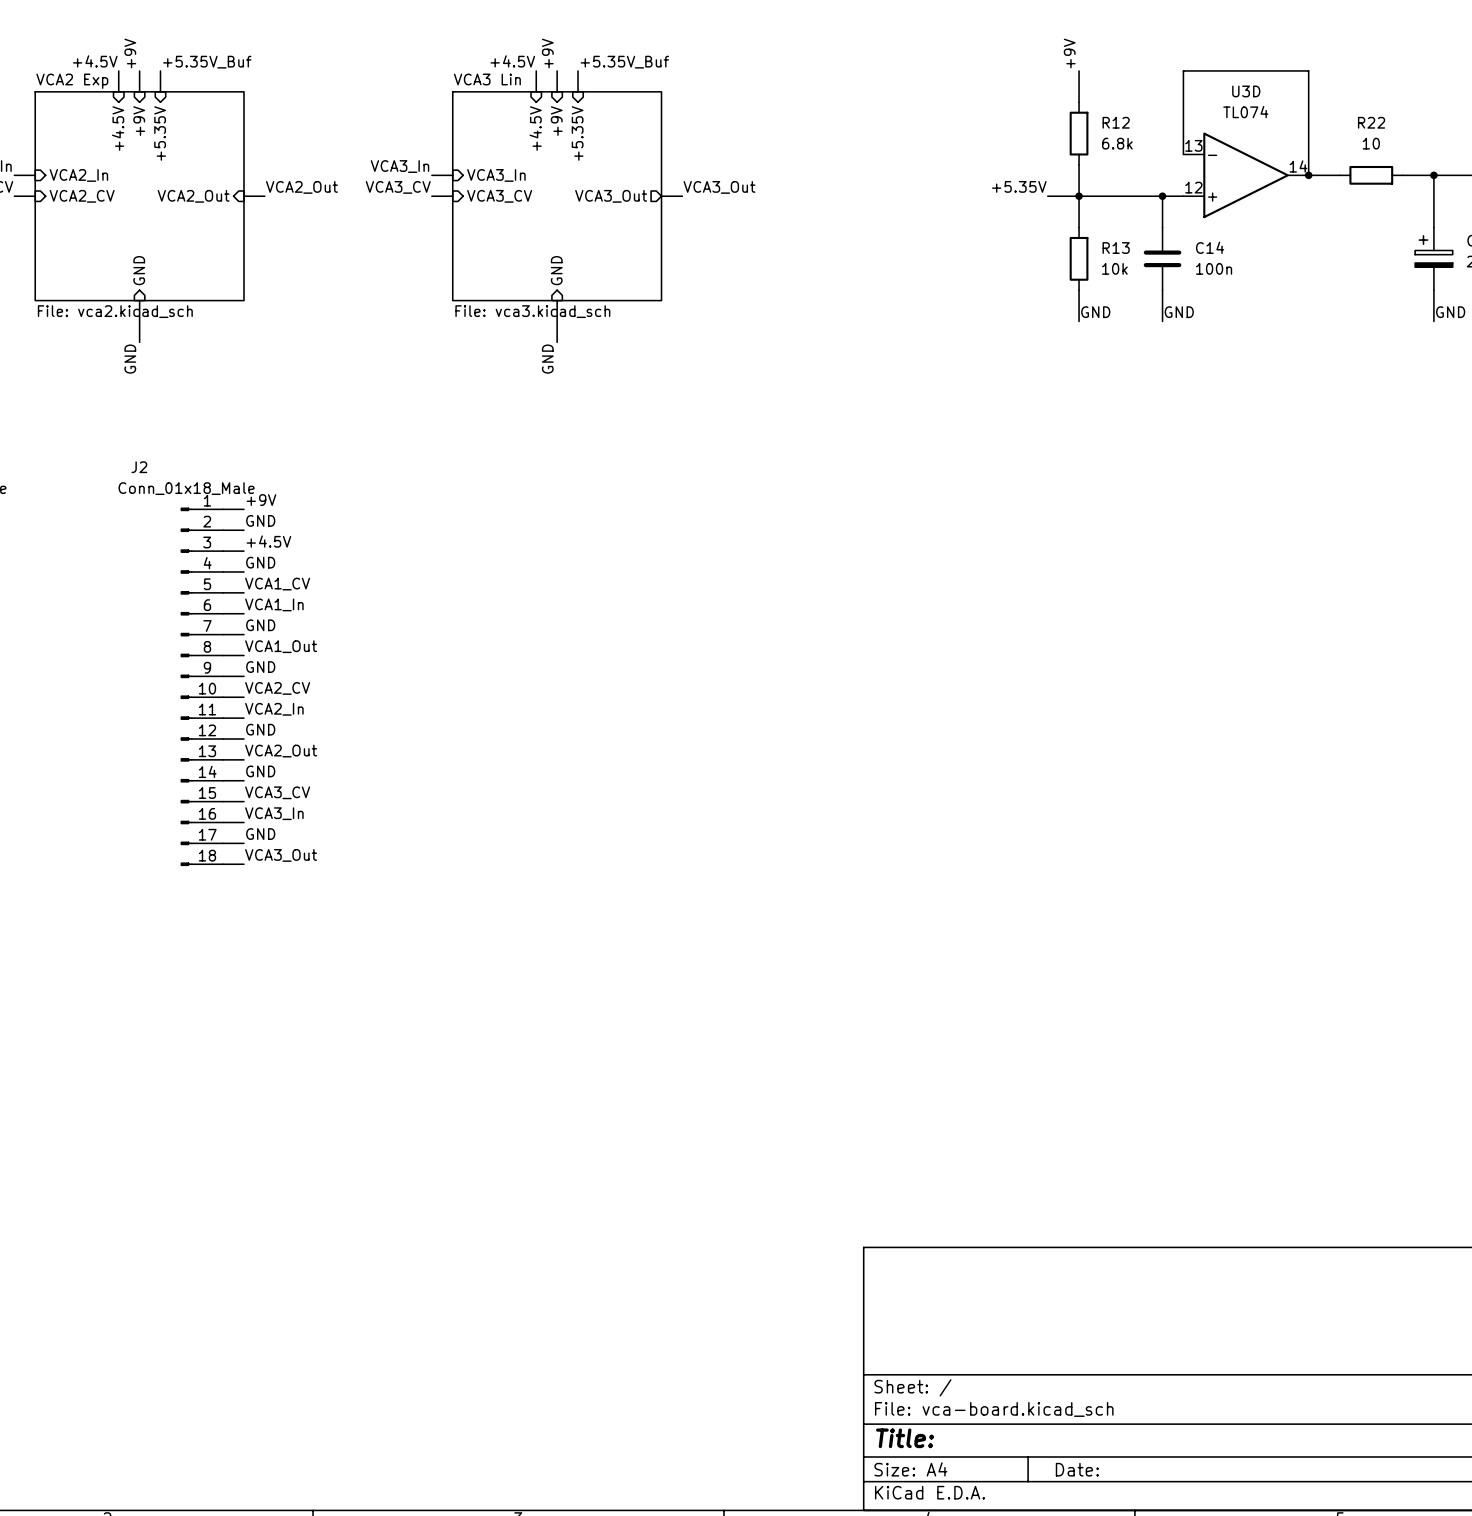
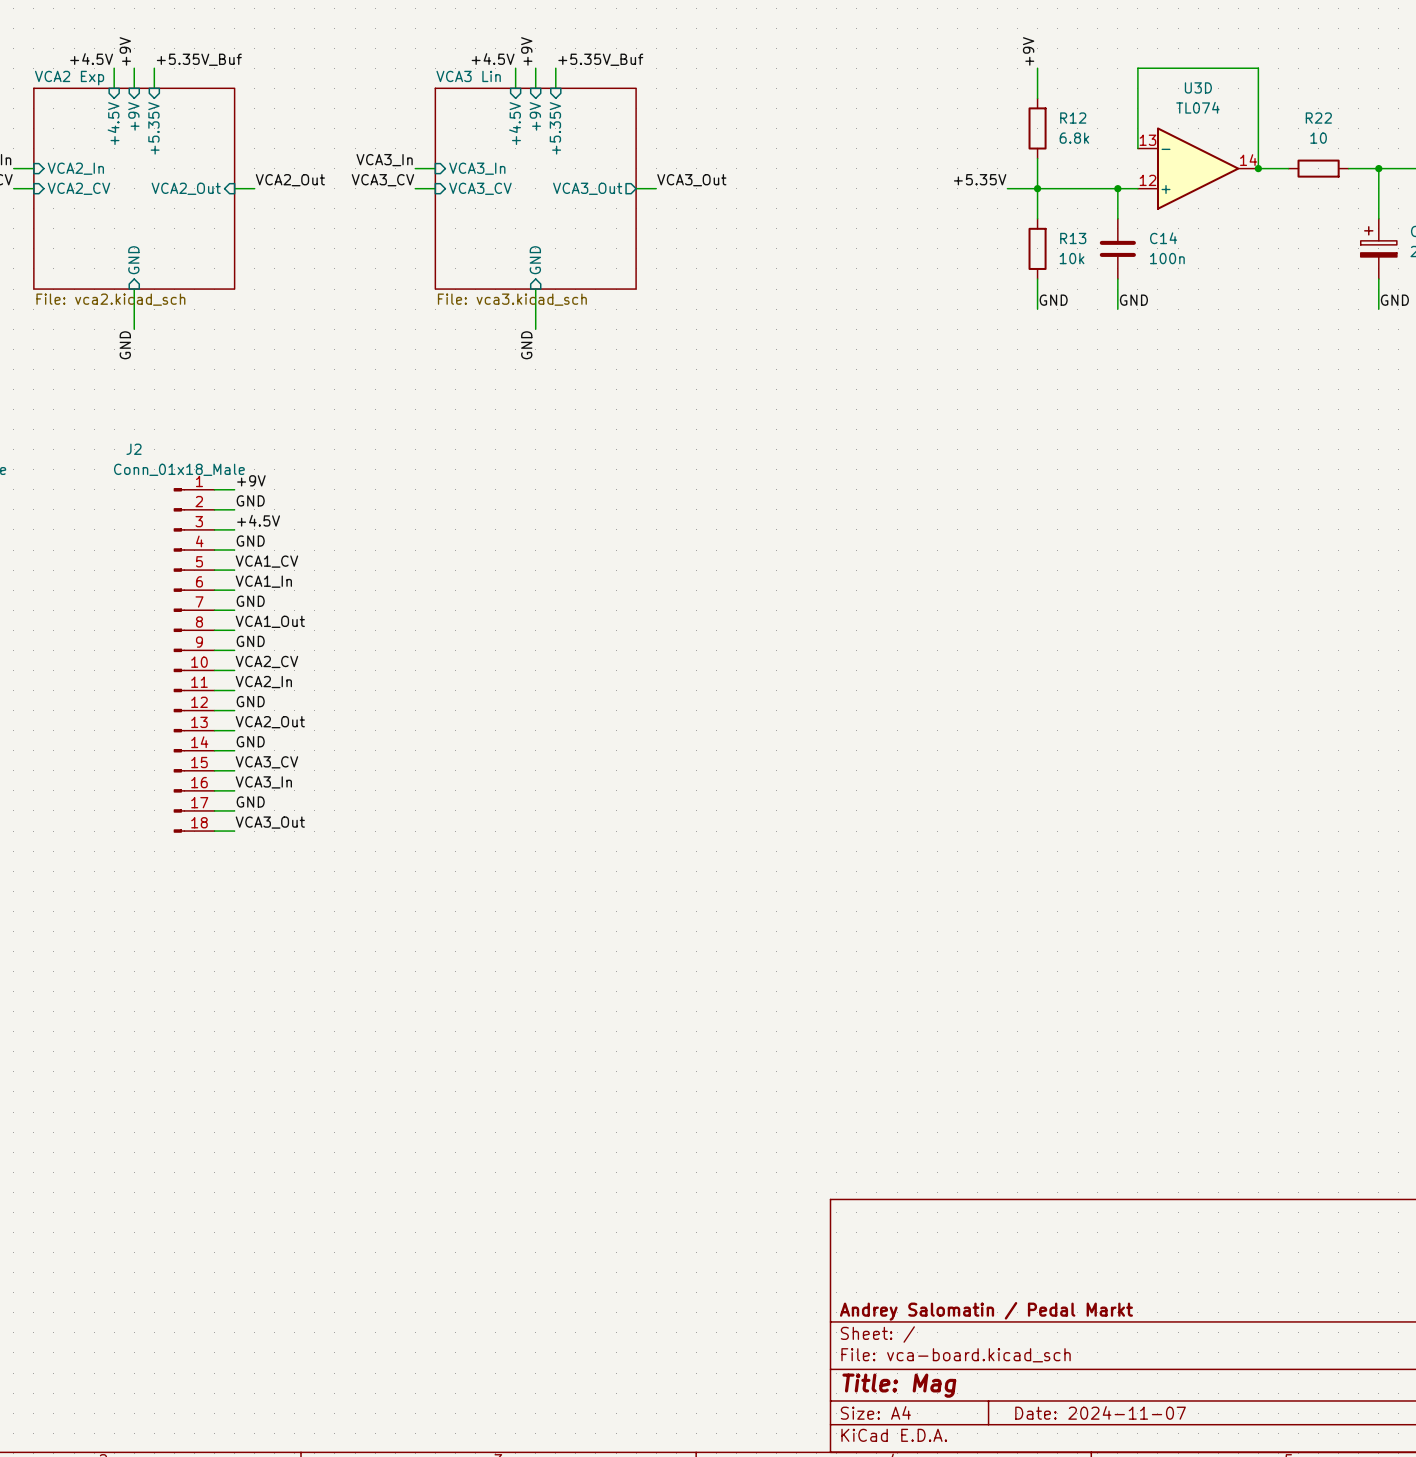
title block: none -> Andrey Salomatin / Pedal Markt (986, 1311)
title block: Title: (905, 1438) -> Title: Mag (899, 1385)
title block: Date: (1077, 1469) -> Date: 2024-11-07 (1100, 1412)

